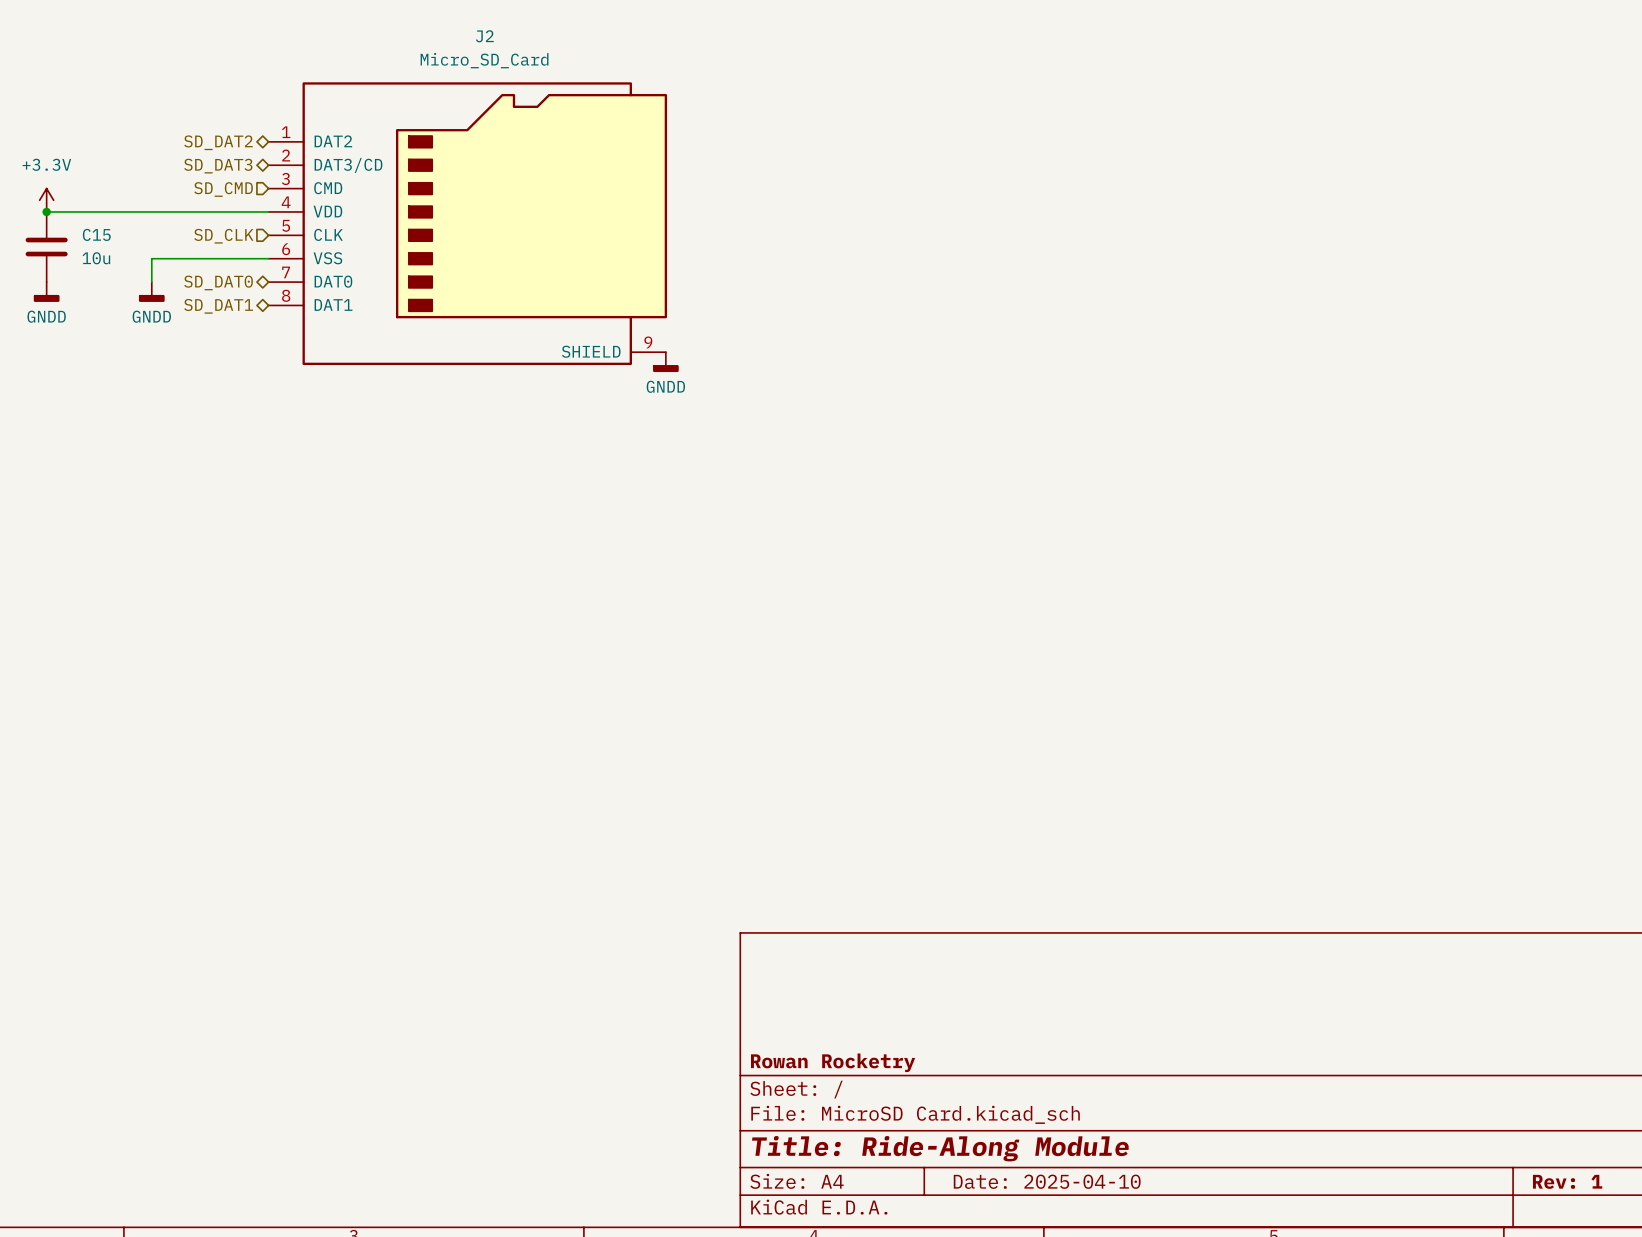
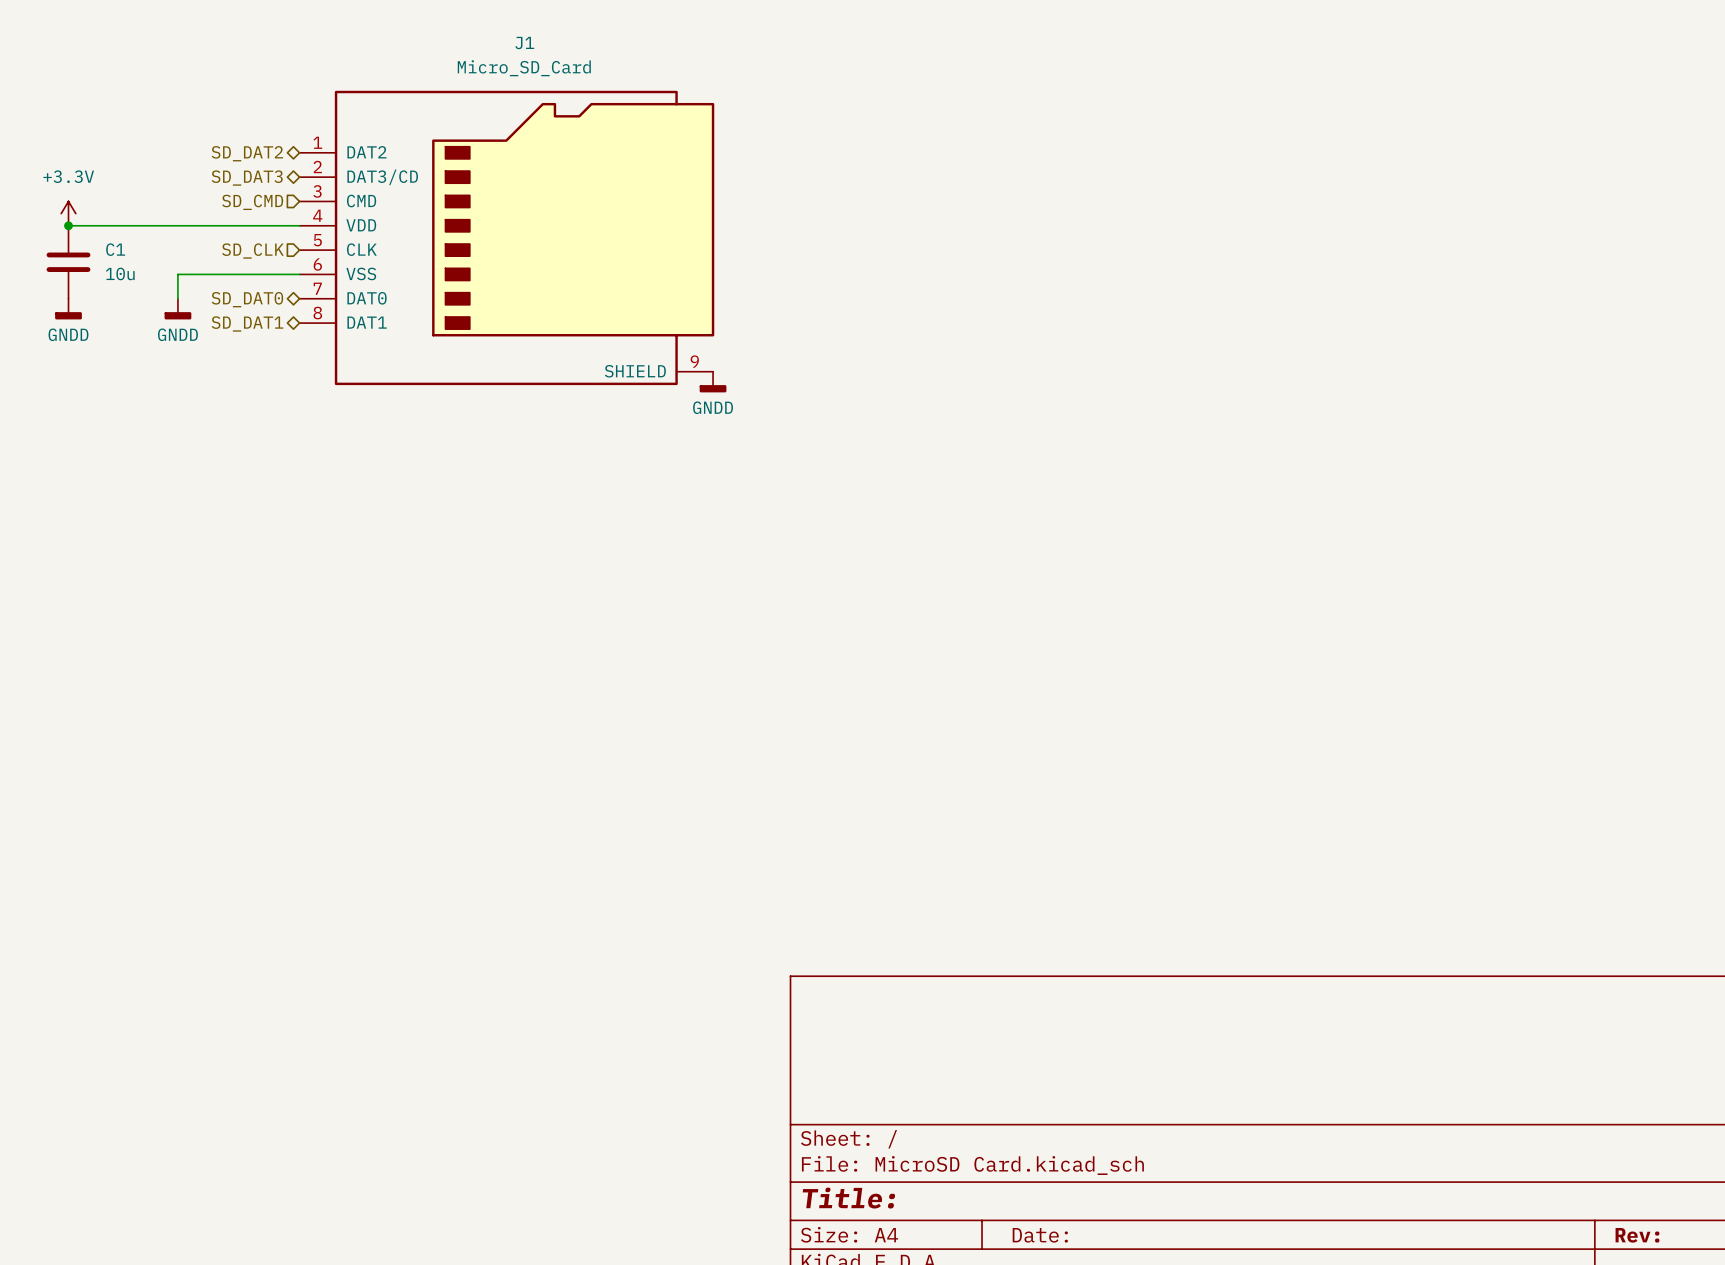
J2 name: J2 (484, 36) -> J1 (524, 43)
C15 name: C15 (96, 234) -> C1 (115, 249)
title block: Rowan Rocketry (833, 1062) -> none
title block: Title: Ride-Along Module (940, 1148) -> Title: (848, 1198)
title block: Date: 2025-04-10 (1047, 1181) -> Date: (1040, 1235)
title block: Rev: 1 (1567, 1181) -> Rev: (1637, 1235)

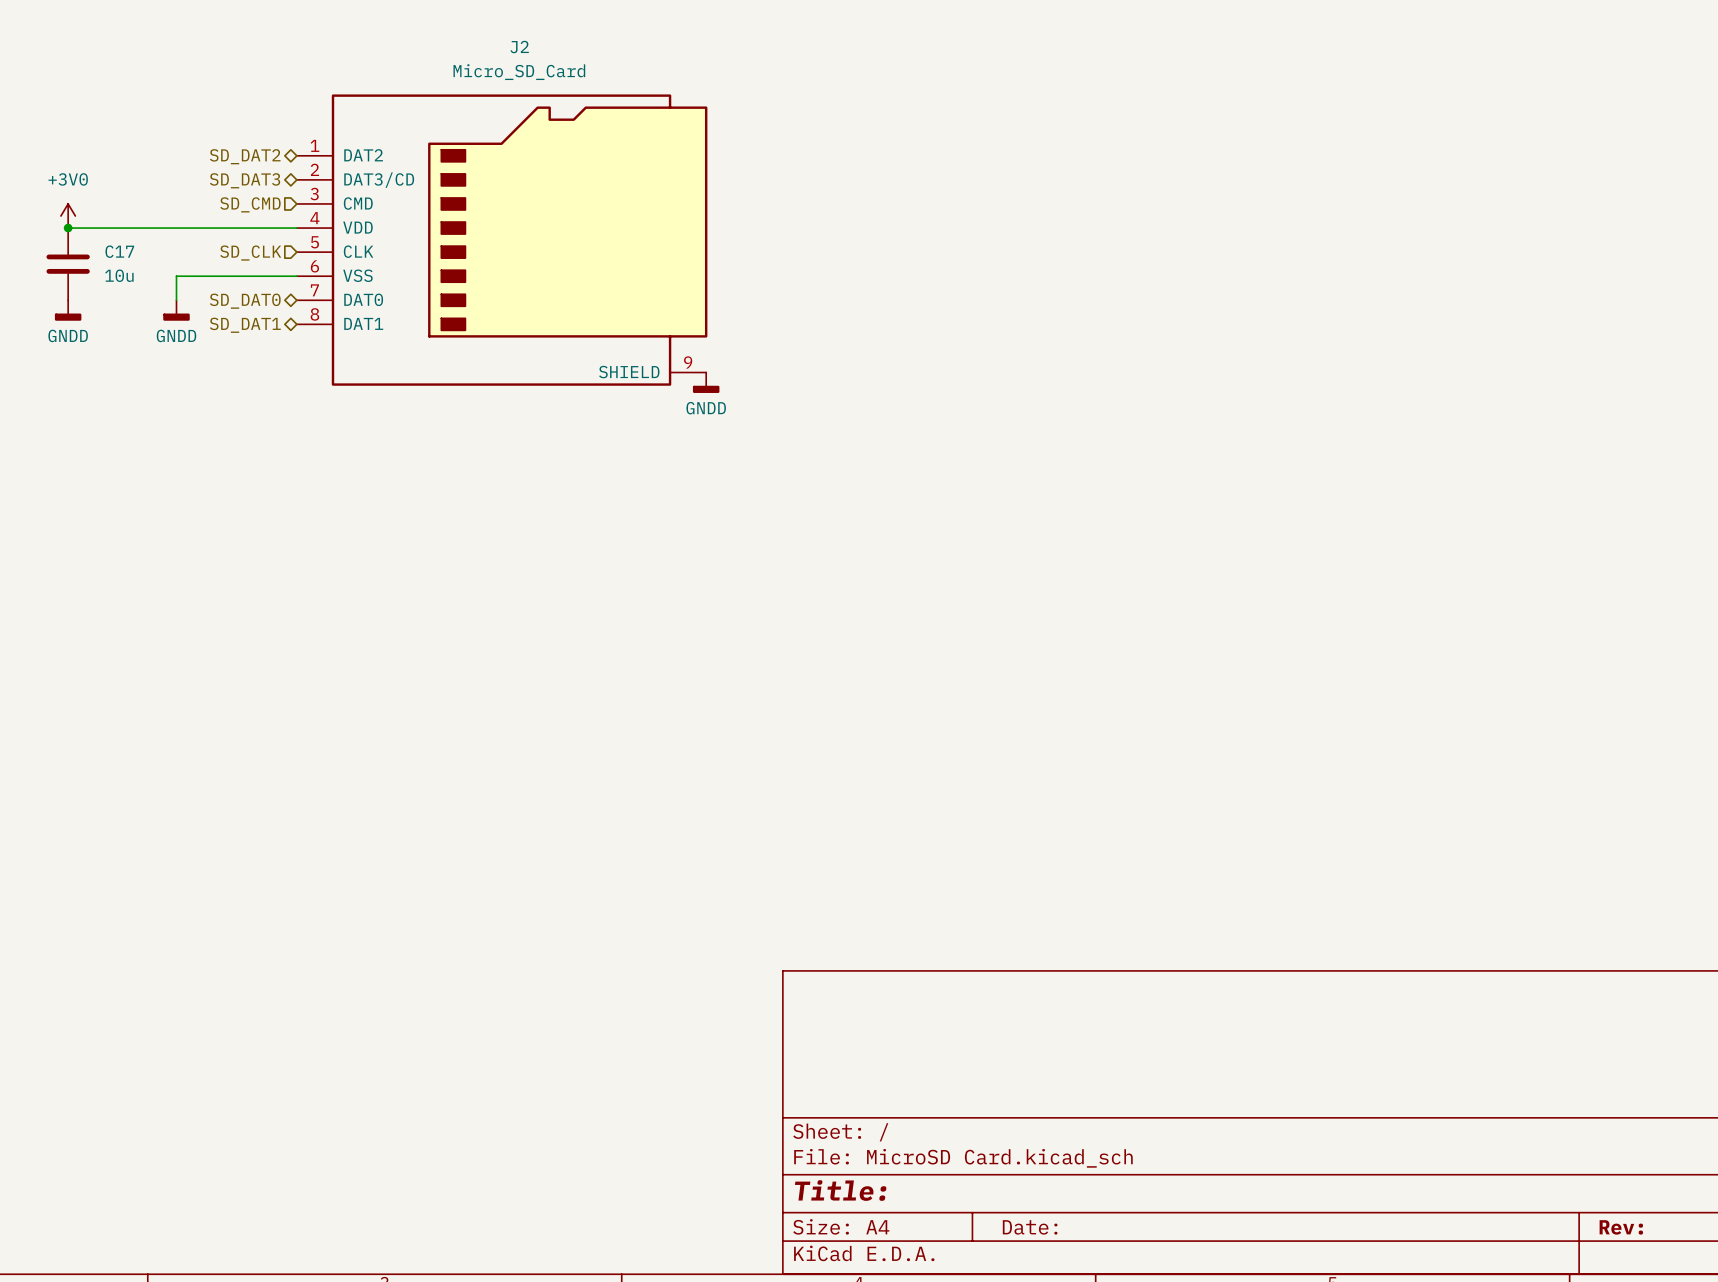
J1 name: J1 (524, 43) -> J2 (519, 47)
power symbol: +3.3V (68, 213) -> +3V0 (68, 216)
C1 name: C1 (115, 249) -> C17 (119, 251)

